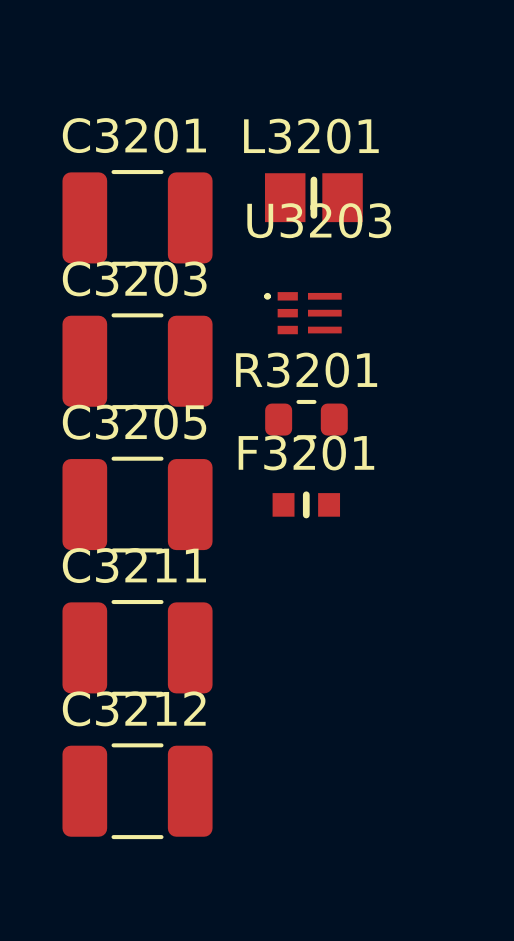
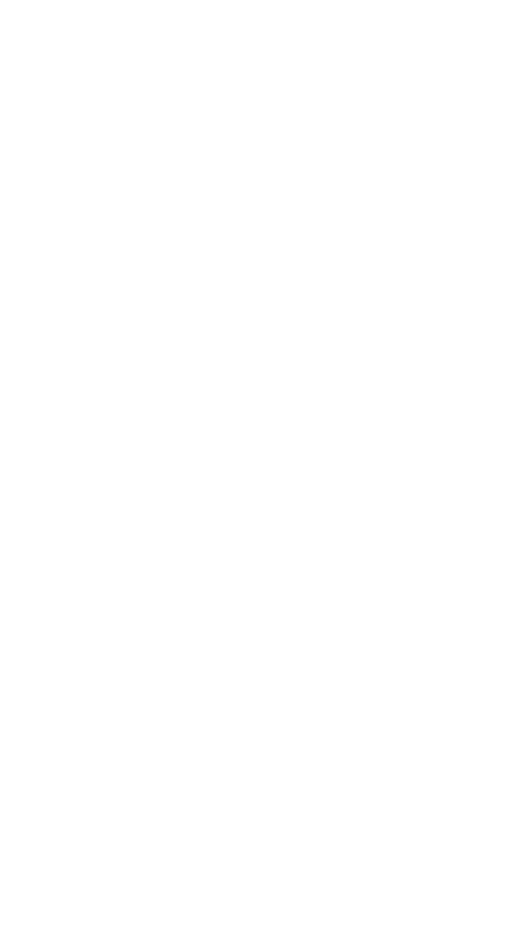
L3201: (313, 197) -> none
C3201: (137, 217) -> none
U3203: (302, 313) -> none
C3203: (137, 361) -> none
R3201: (306, 419) -> none
C3205: (137, 504) -> none
F3201: (306, 504) -> none
C3211: (137, 647) -> none
C3212: (137, 791) -> none

